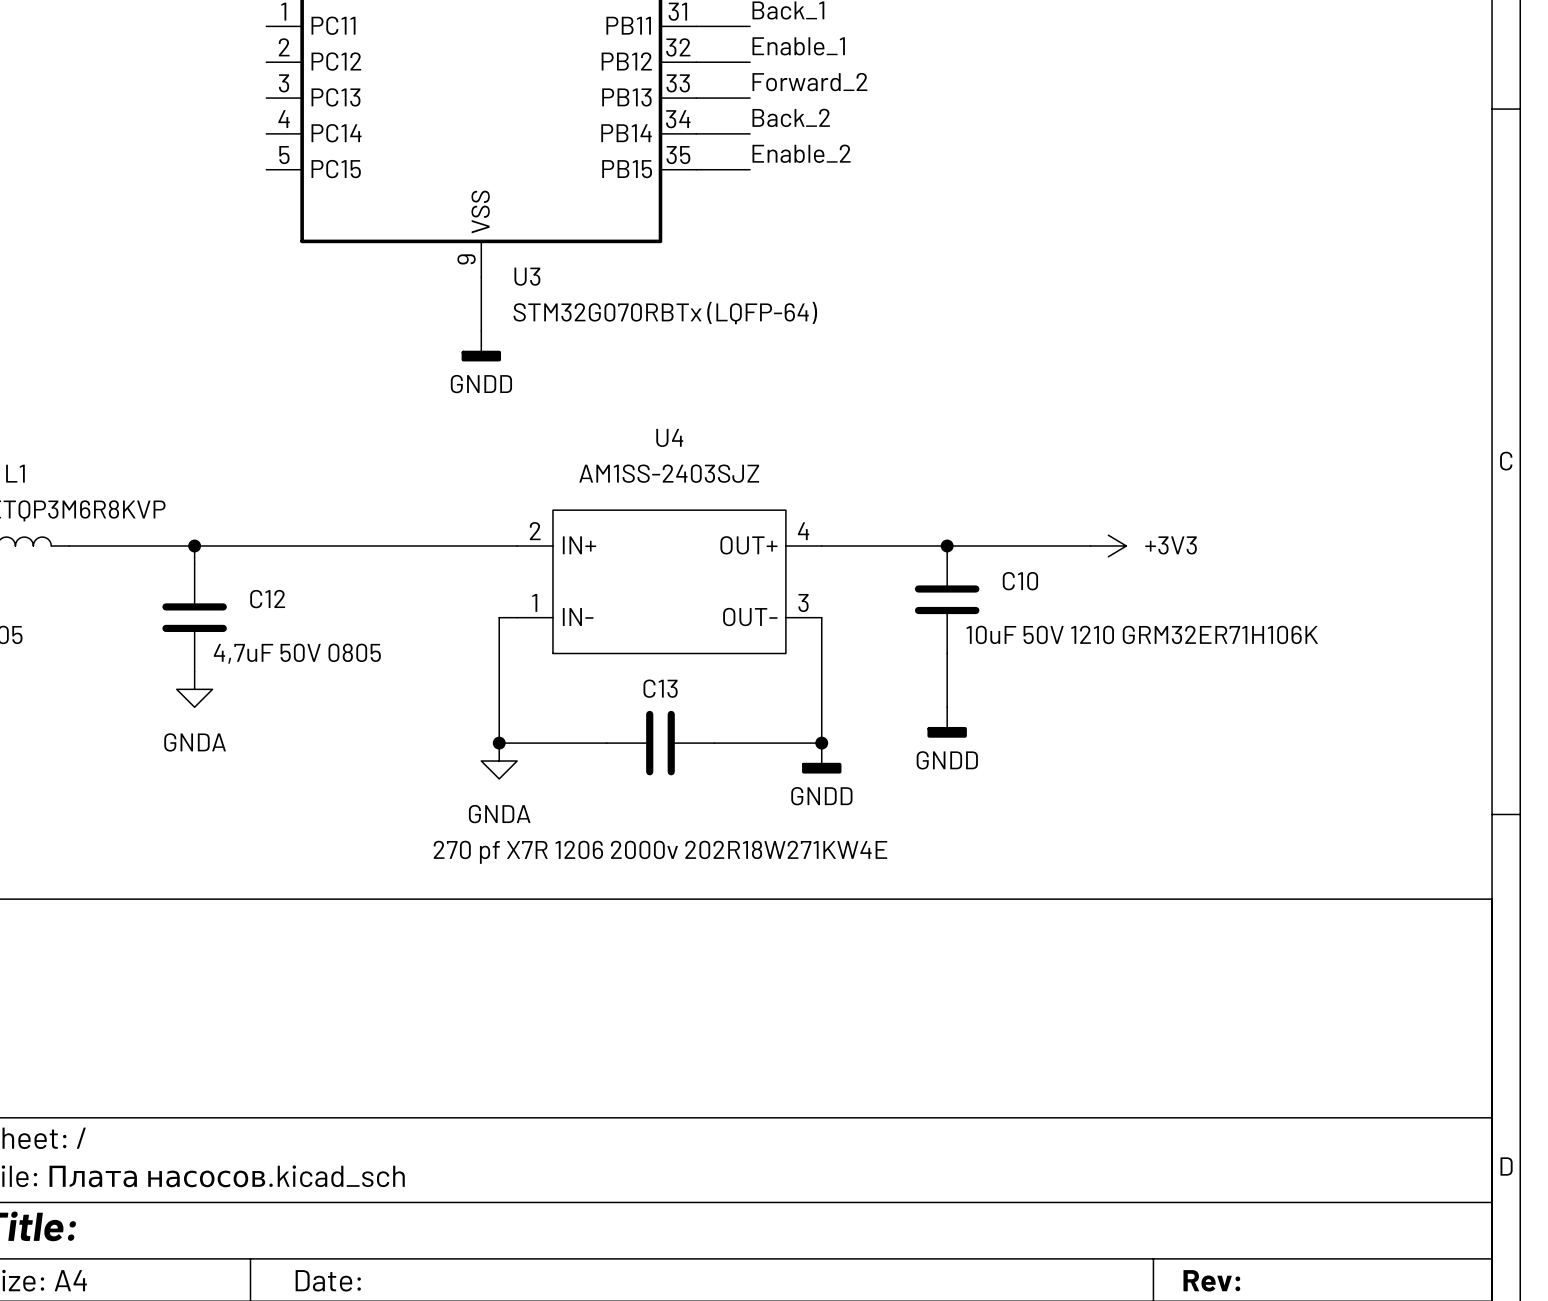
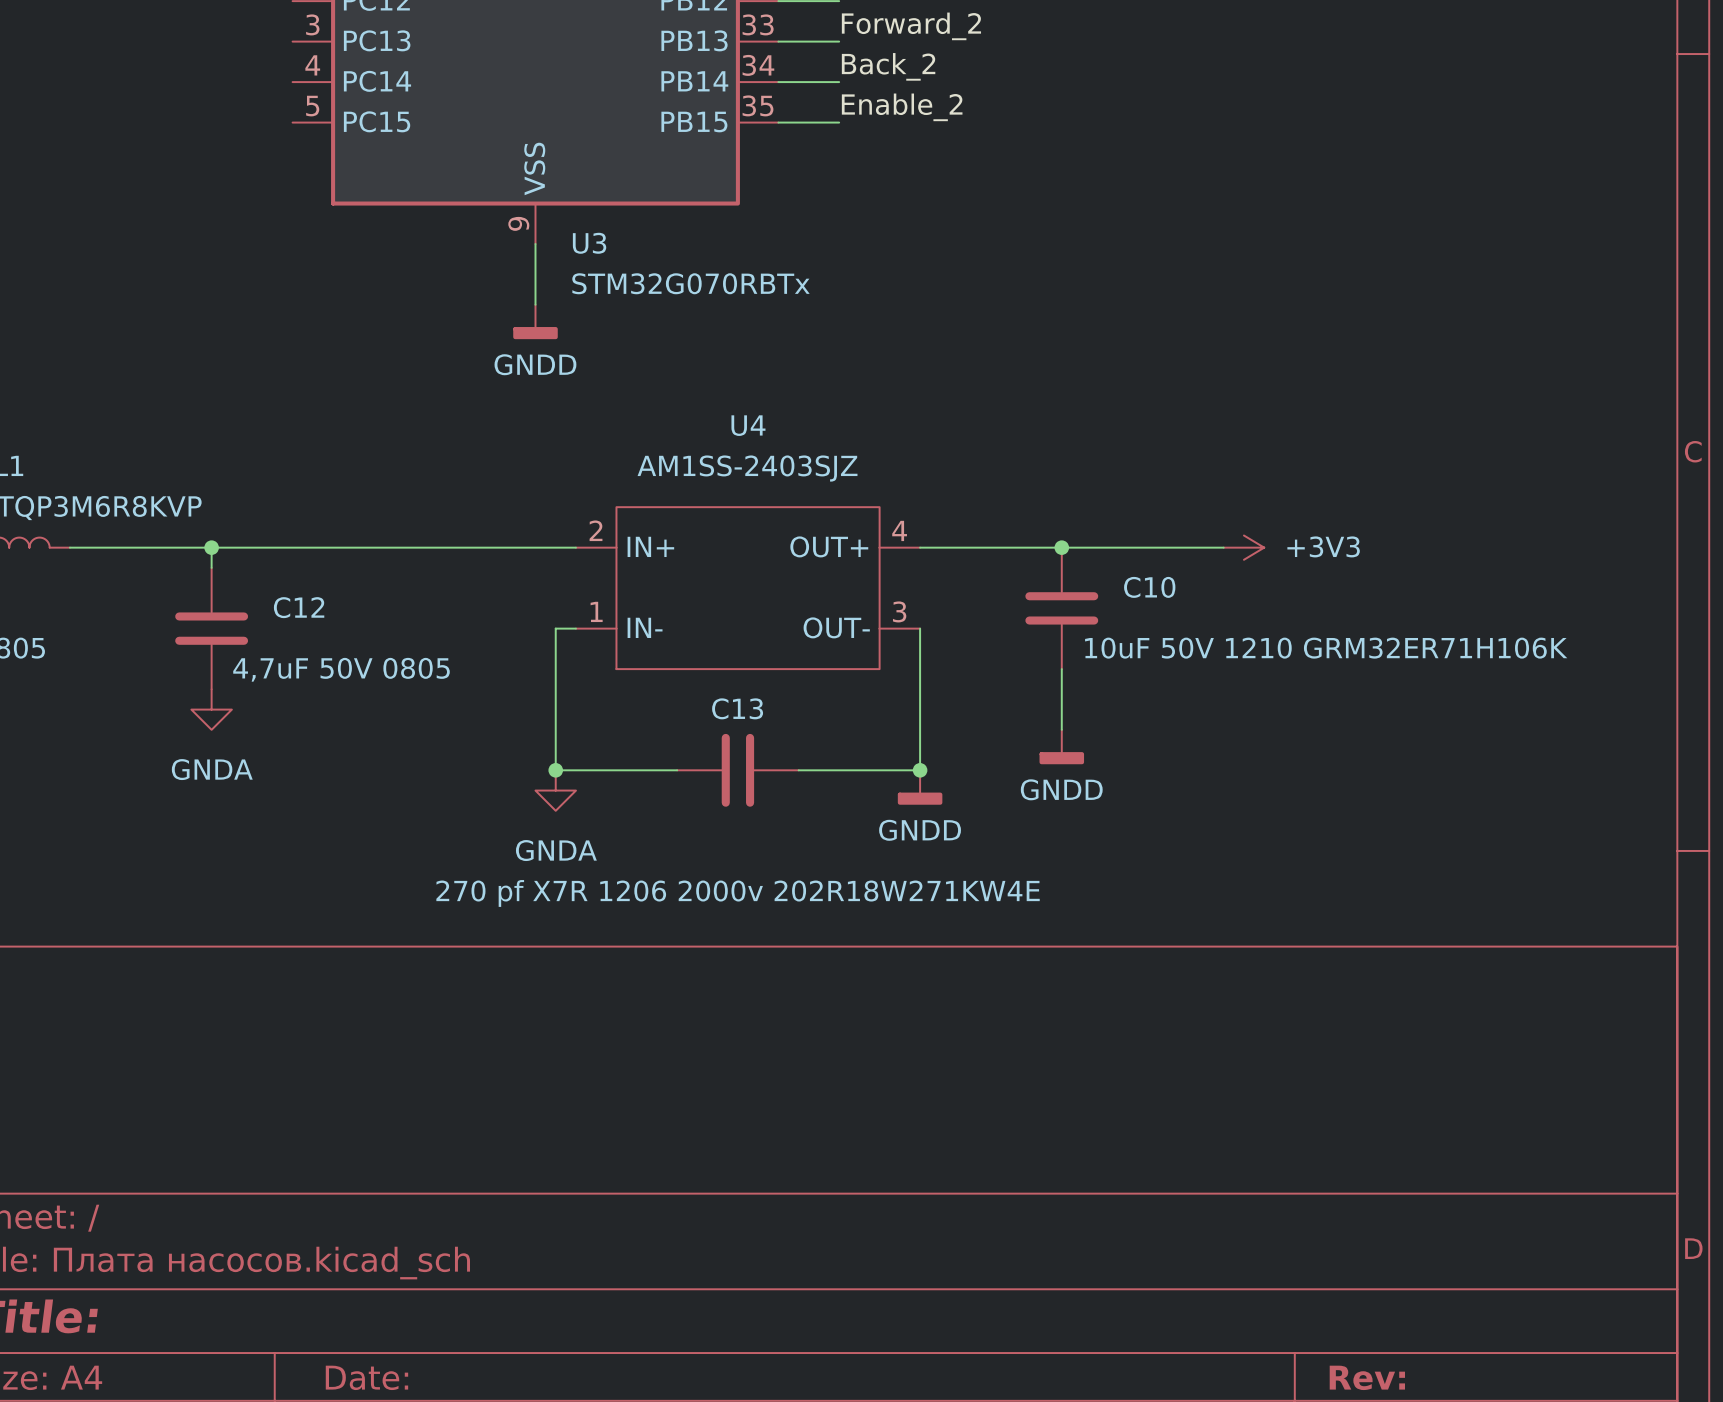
U3 value: STM32G070RBTx (LQFP-64) (665, 313) -> STM32G070RBTx (690, 283)

